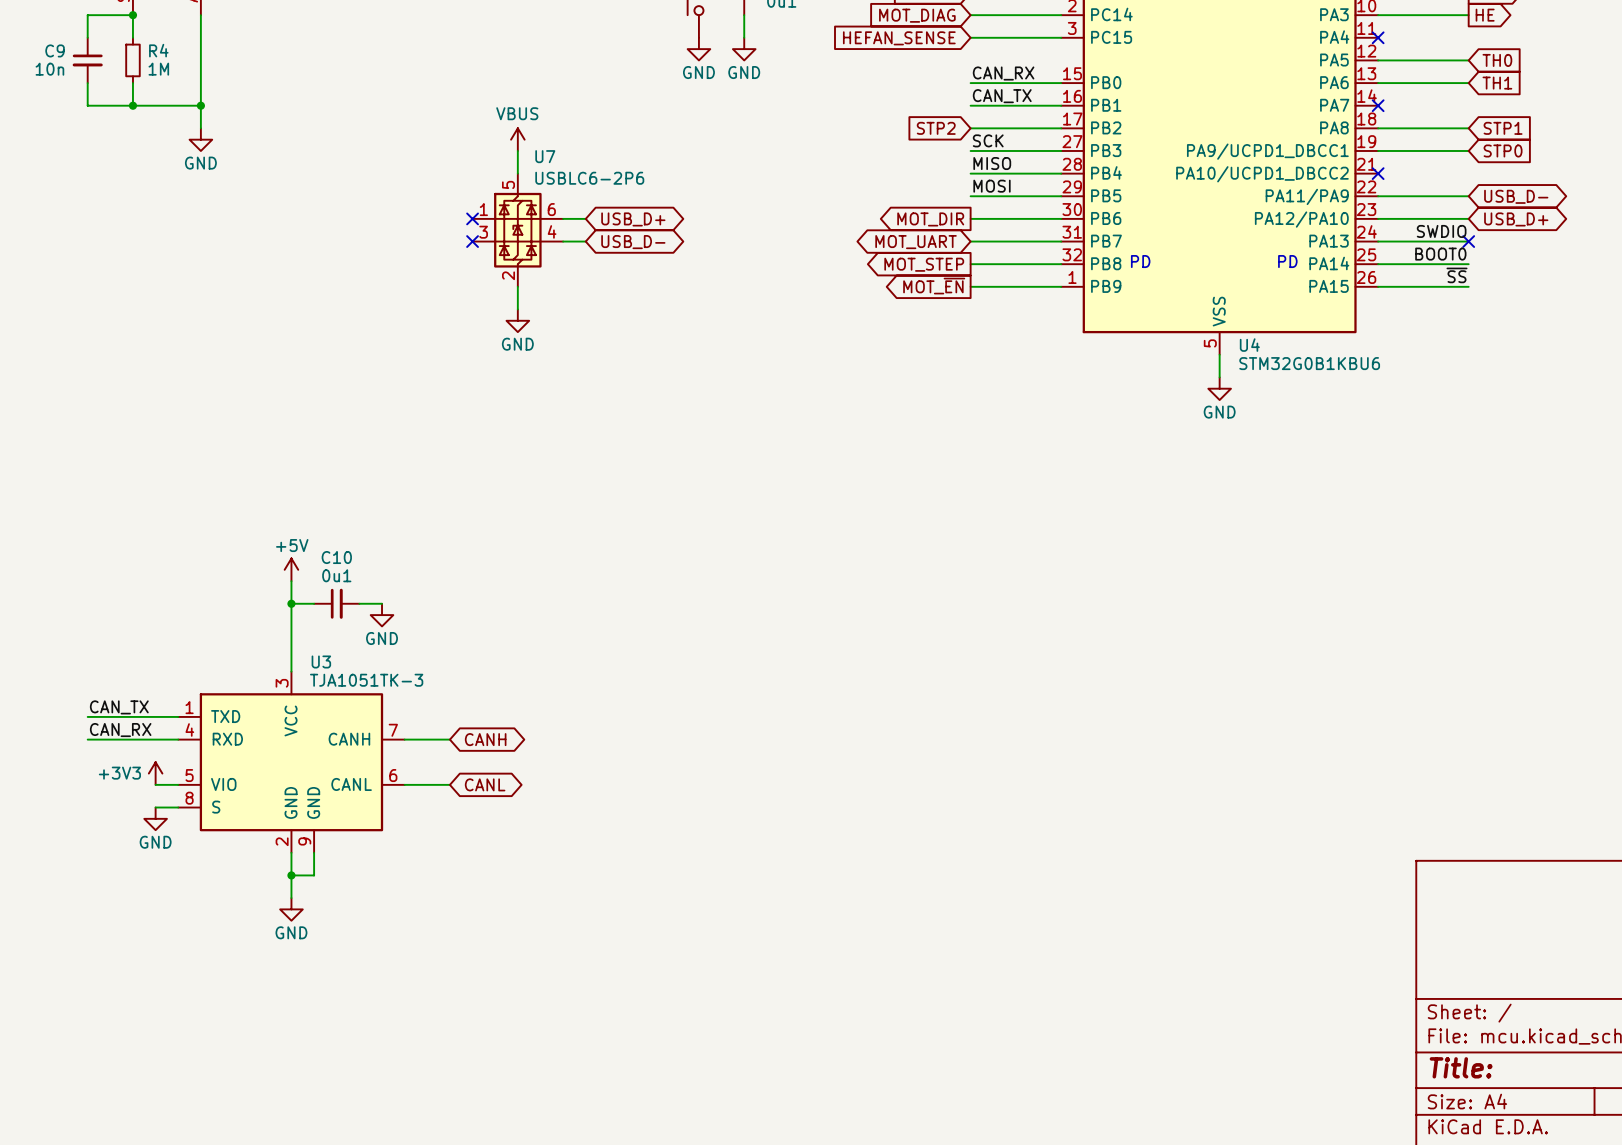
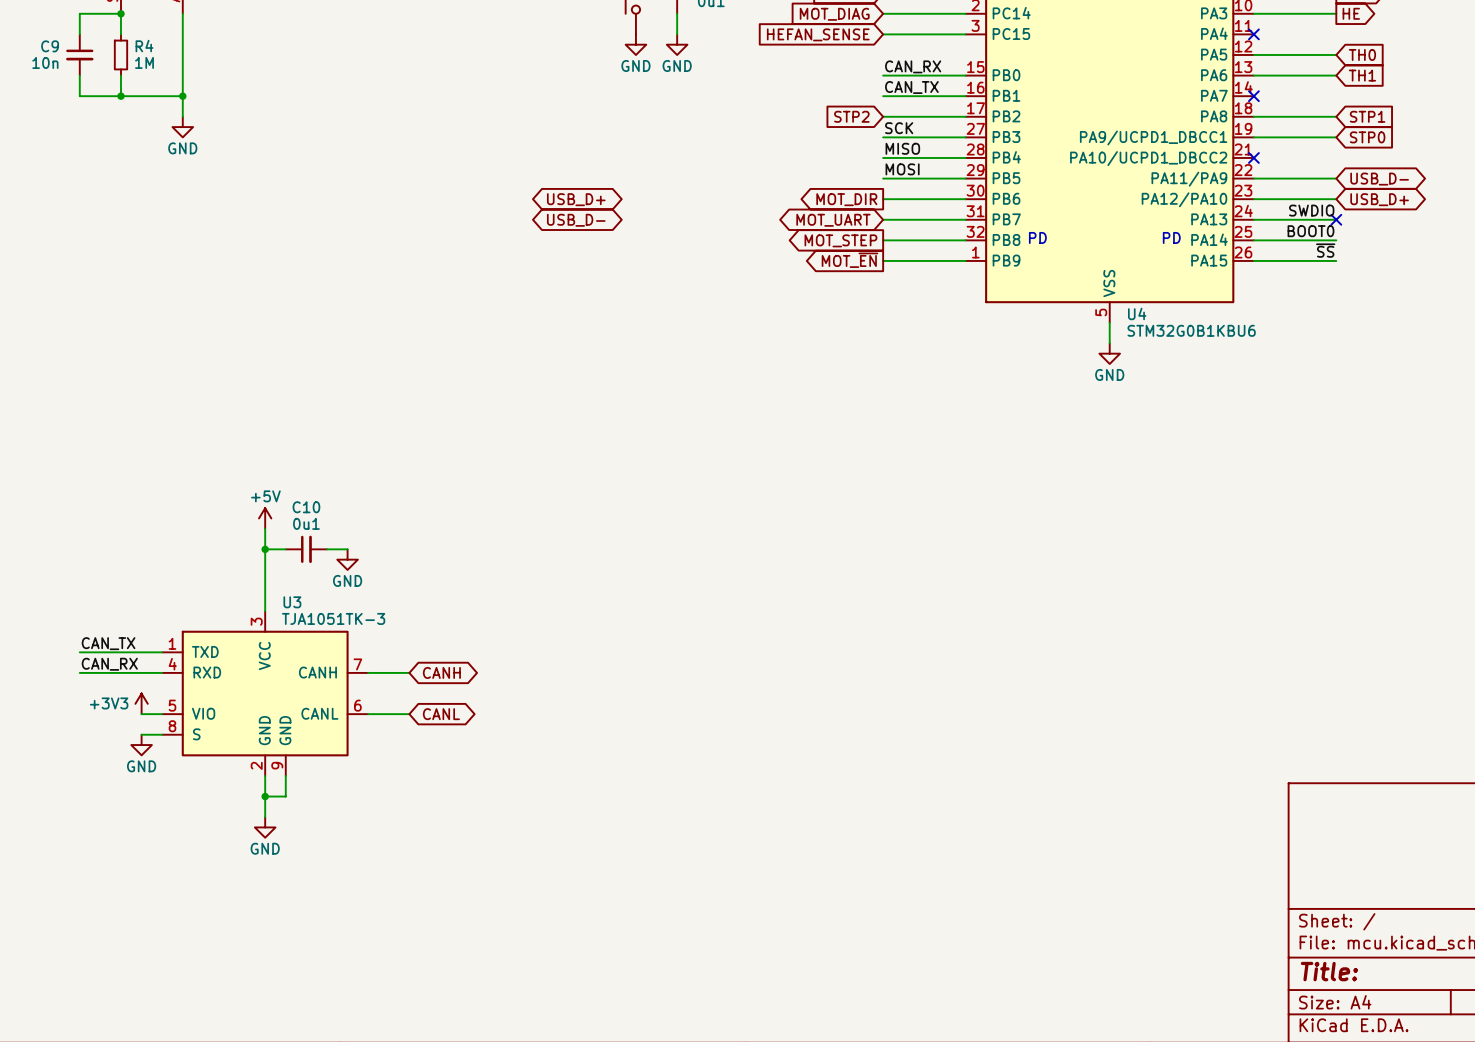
power symbol: VBUS (517, 139) -> none
wire: (517, 150) (517, 173) -> none
no-connect mark: (472, 218) -> none
wire: (563, 218) (585, 218) -> none
U7: USBLC6-2P6 (517, 230) -> none
no-connect mark: (472, 241) -> none
wire: (563, 241) (585, 241) -> none
wire: (517, 286) (517, 309) -> none
power symbol: GND (517, 320) -> none

